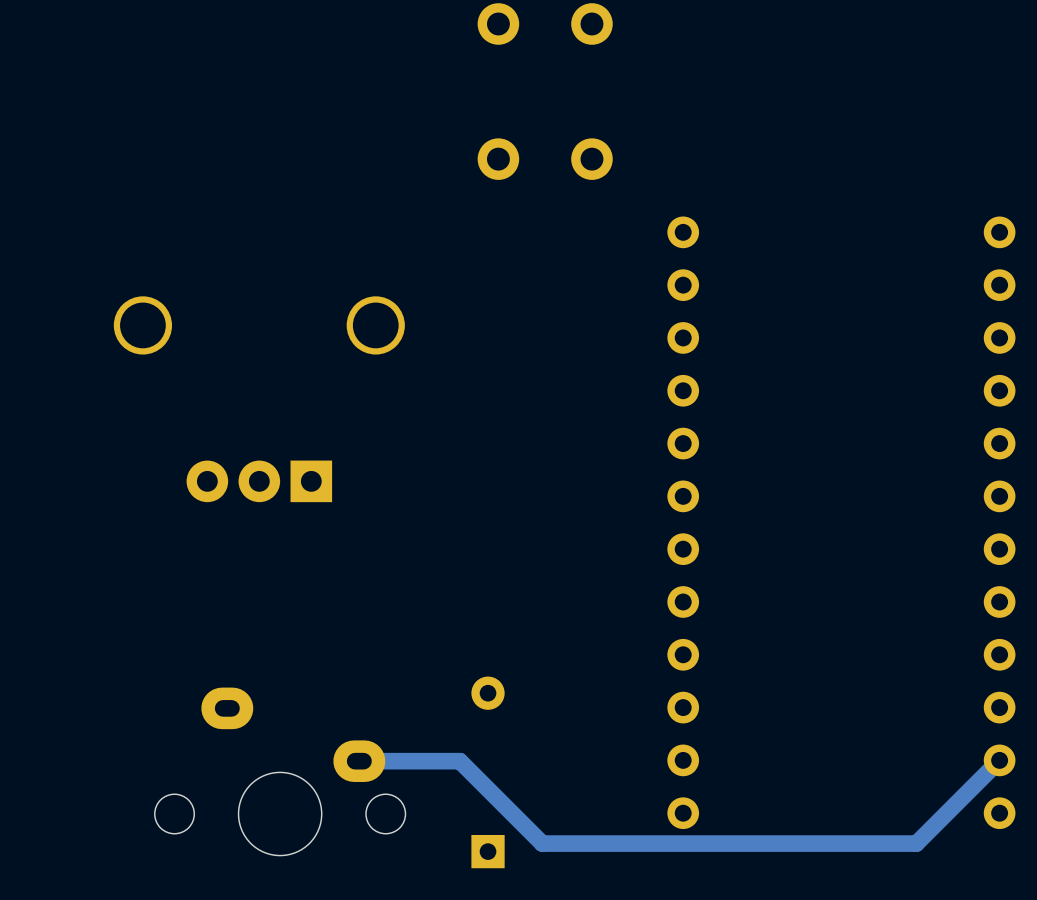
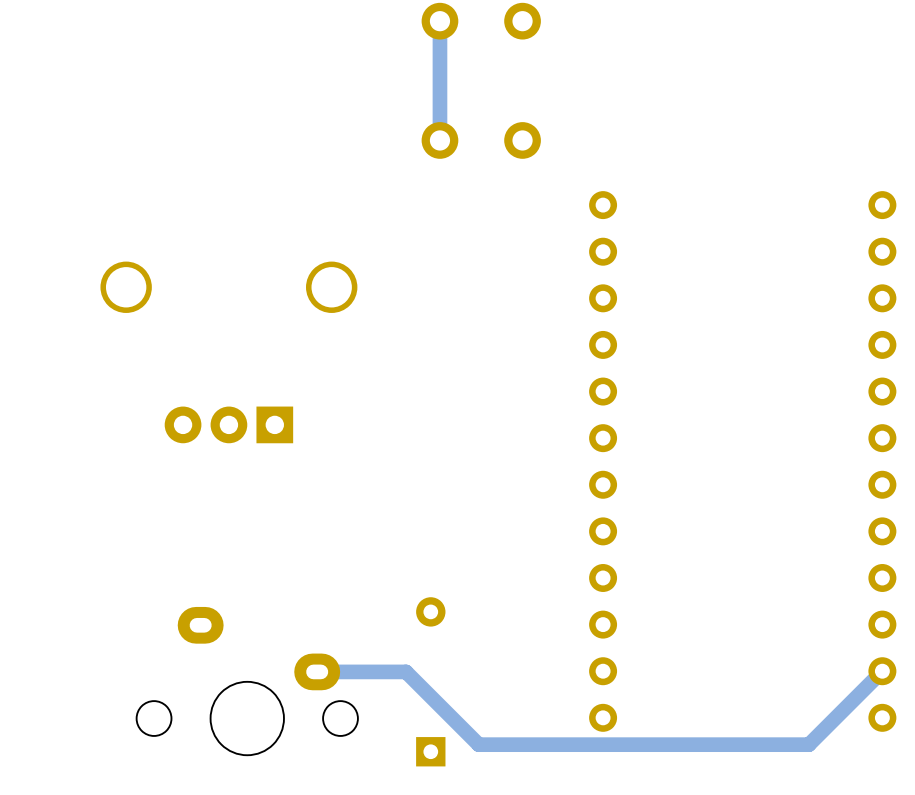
track: none -> (439, 21) (439, 140)

